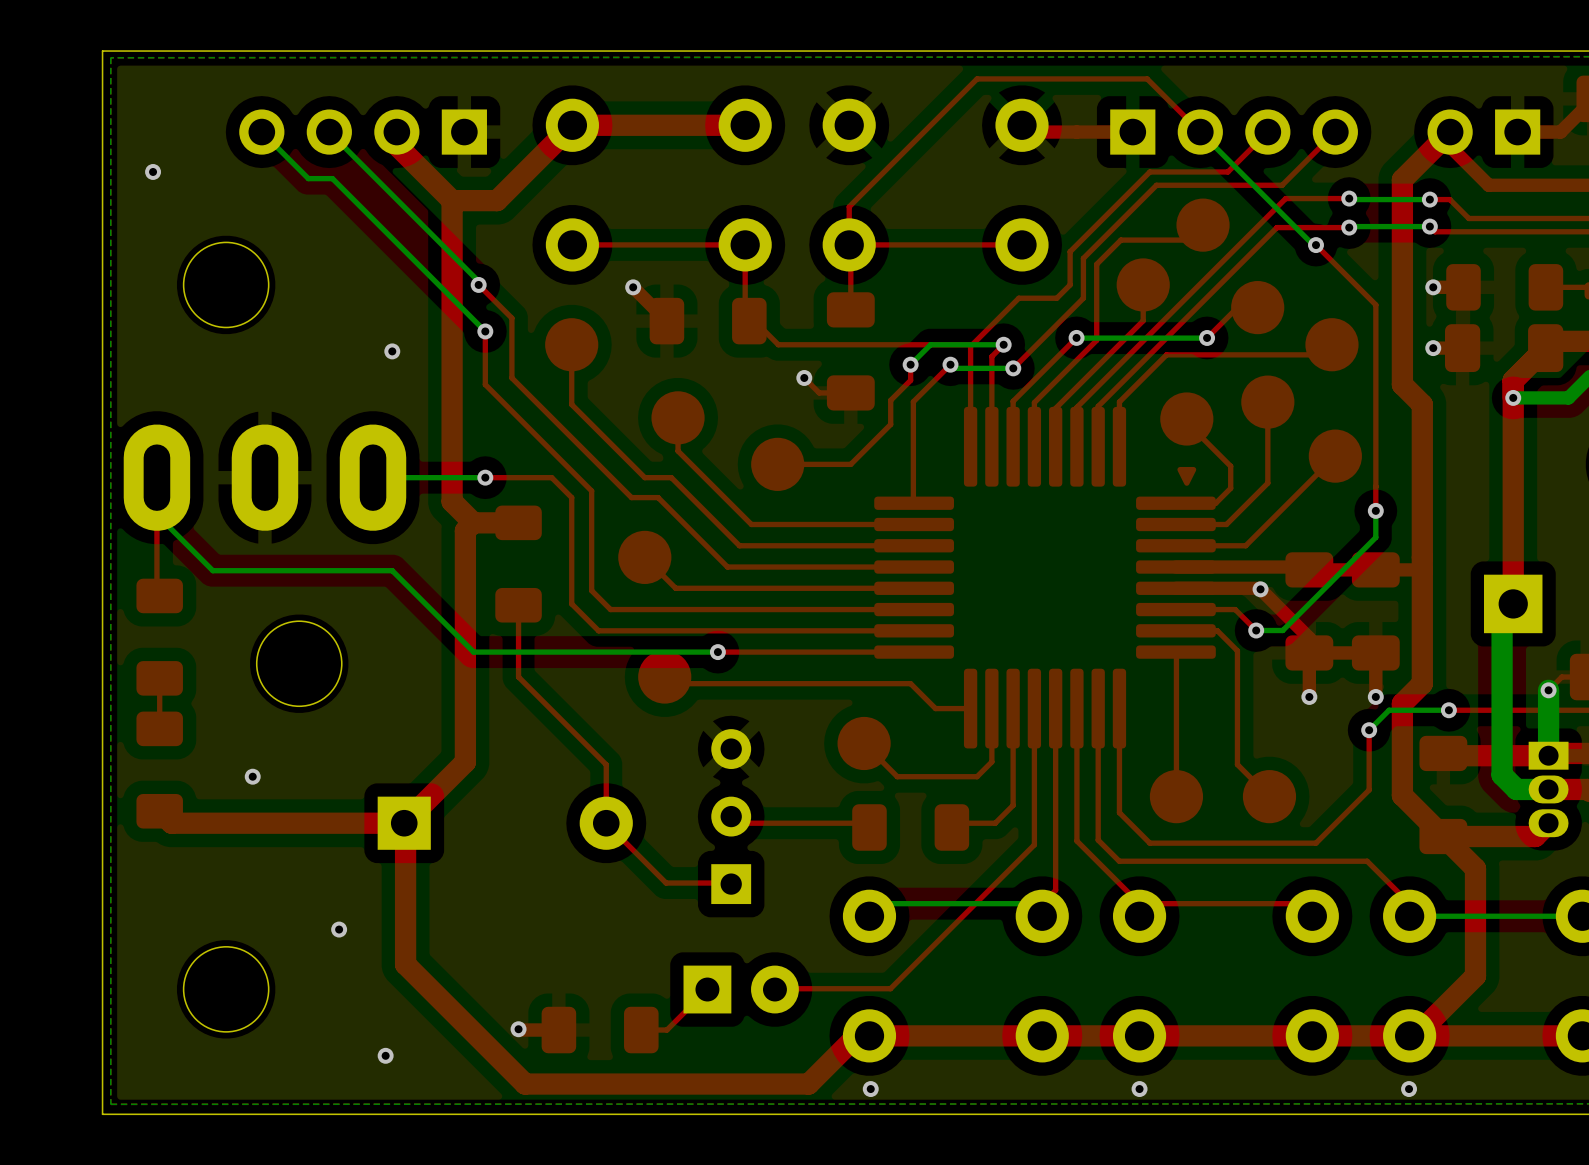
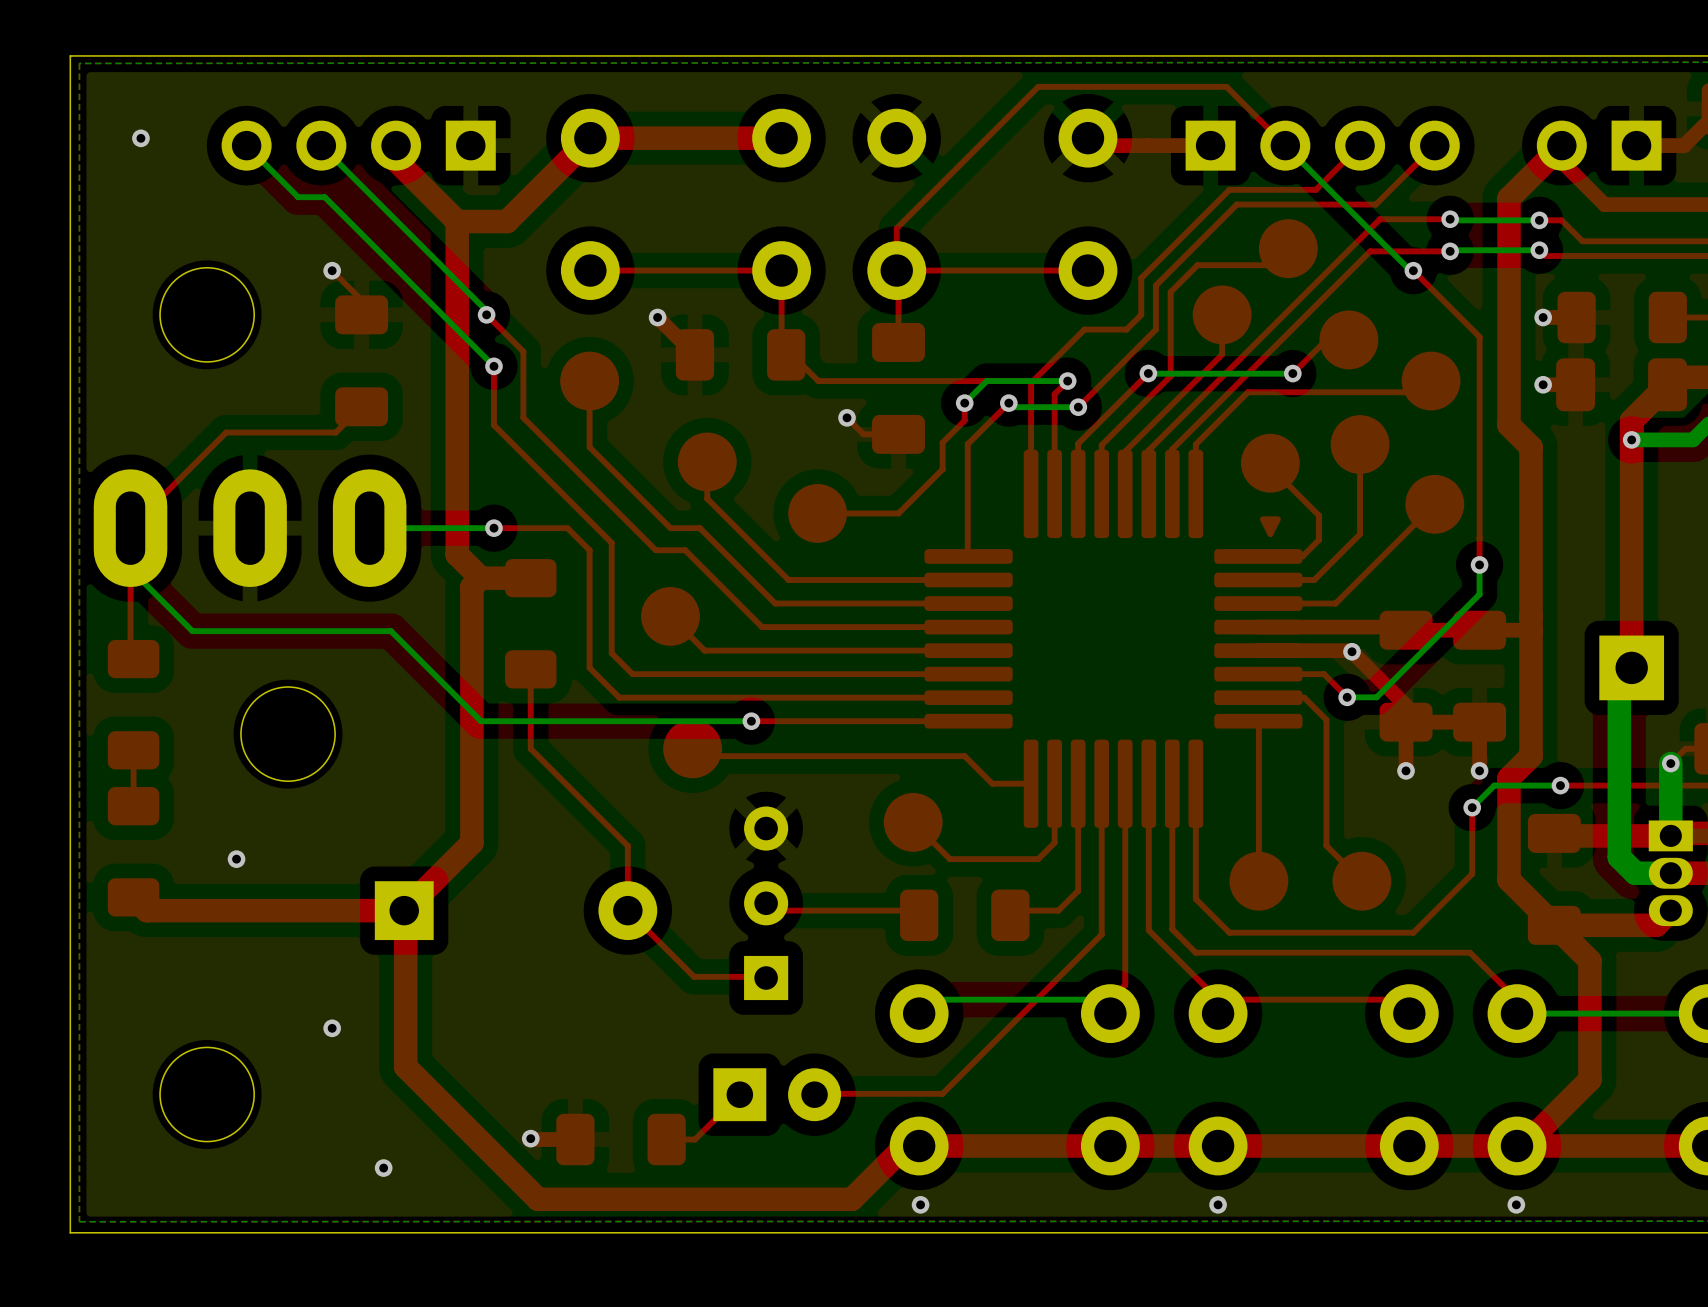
via position: (153, 171) -> (140, 138)
top track: none -> (332, 270) (361, 300) (361, 314)
via: none -> (332, 270)
part: none -> (361, 360)
via: (392, 351) -> none
top track: none -> (361, 406) (335, 432) (226, 432) (130, 528)

